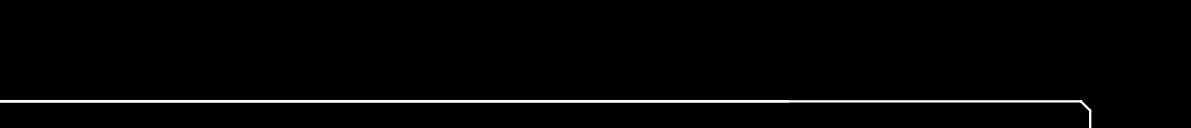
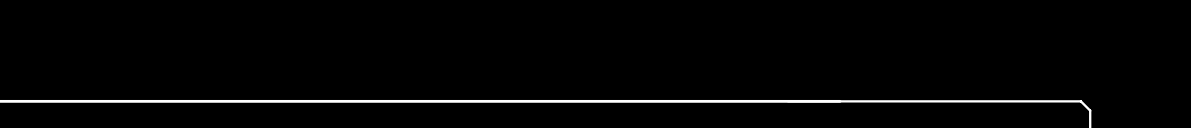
board edge: none -> (788, 101) (840, 101)

